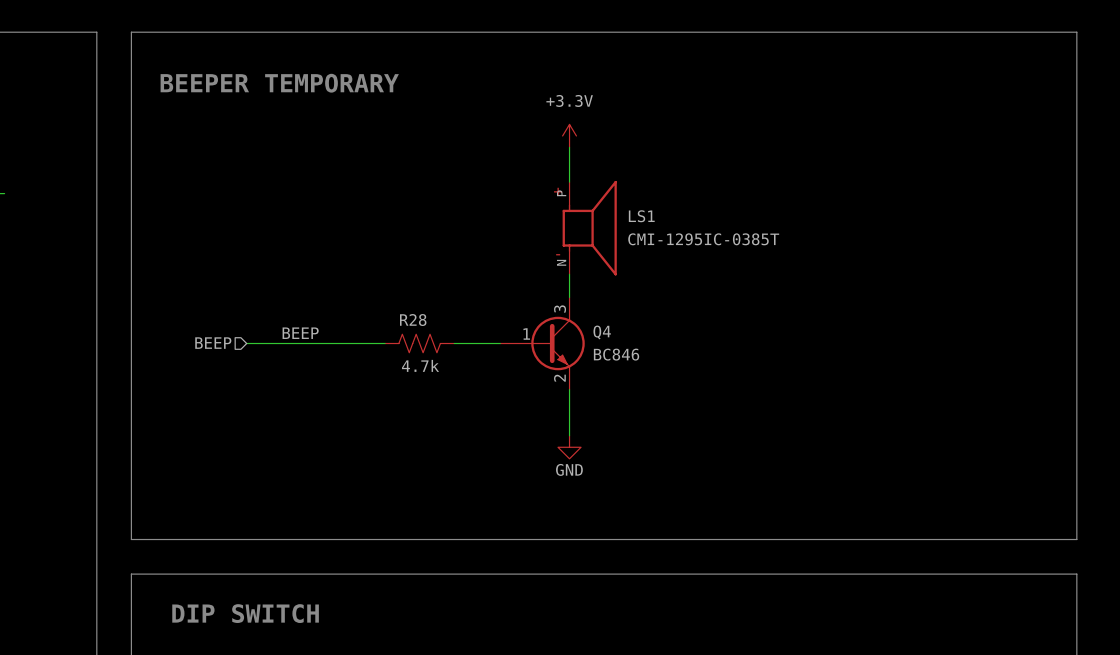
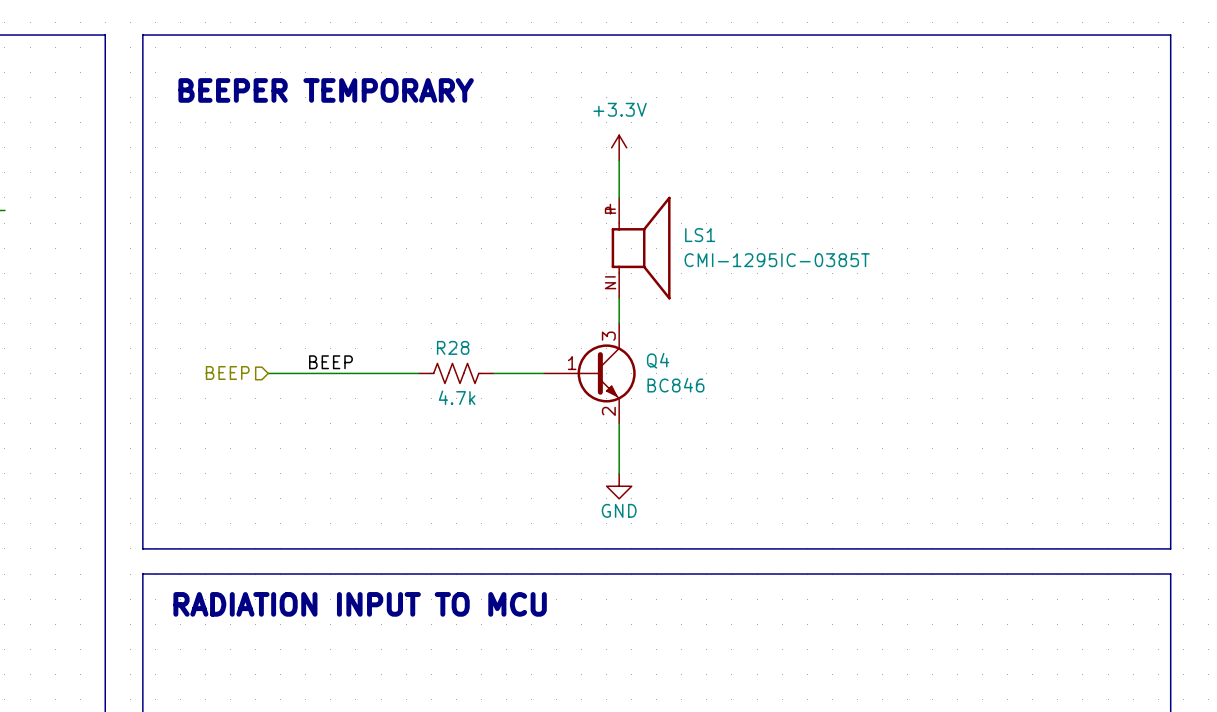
line: (131, 504) (131, 527) -> (142, 548) (1170, 548)
line: (1076, 504) (1076, 527) -> (142, 574) (1170, 574)
line: (131, 539) (1076, 539) -> (142, 586) (142, 624)
text: none -> RADIATION INPUT TO MCU (360, 604)
line: (131, 574) (1076, 574) -> (1170, 586) (1170, 624)
text: DIP SWITCH (245, 613) -> none

